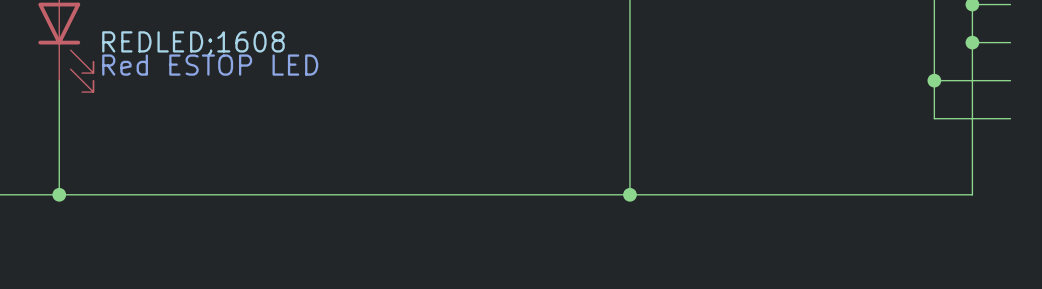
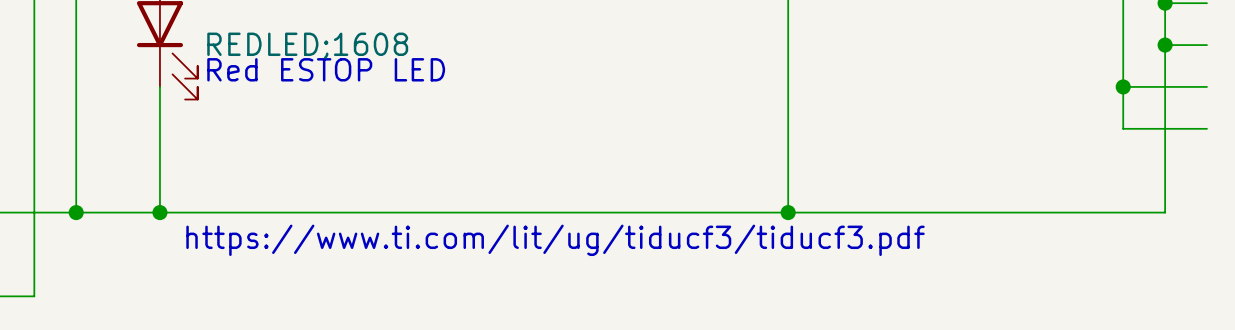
text: none -> https://www.ti.com/lit/ug/tiducf3/tiducf3.pdf (555, 240)

